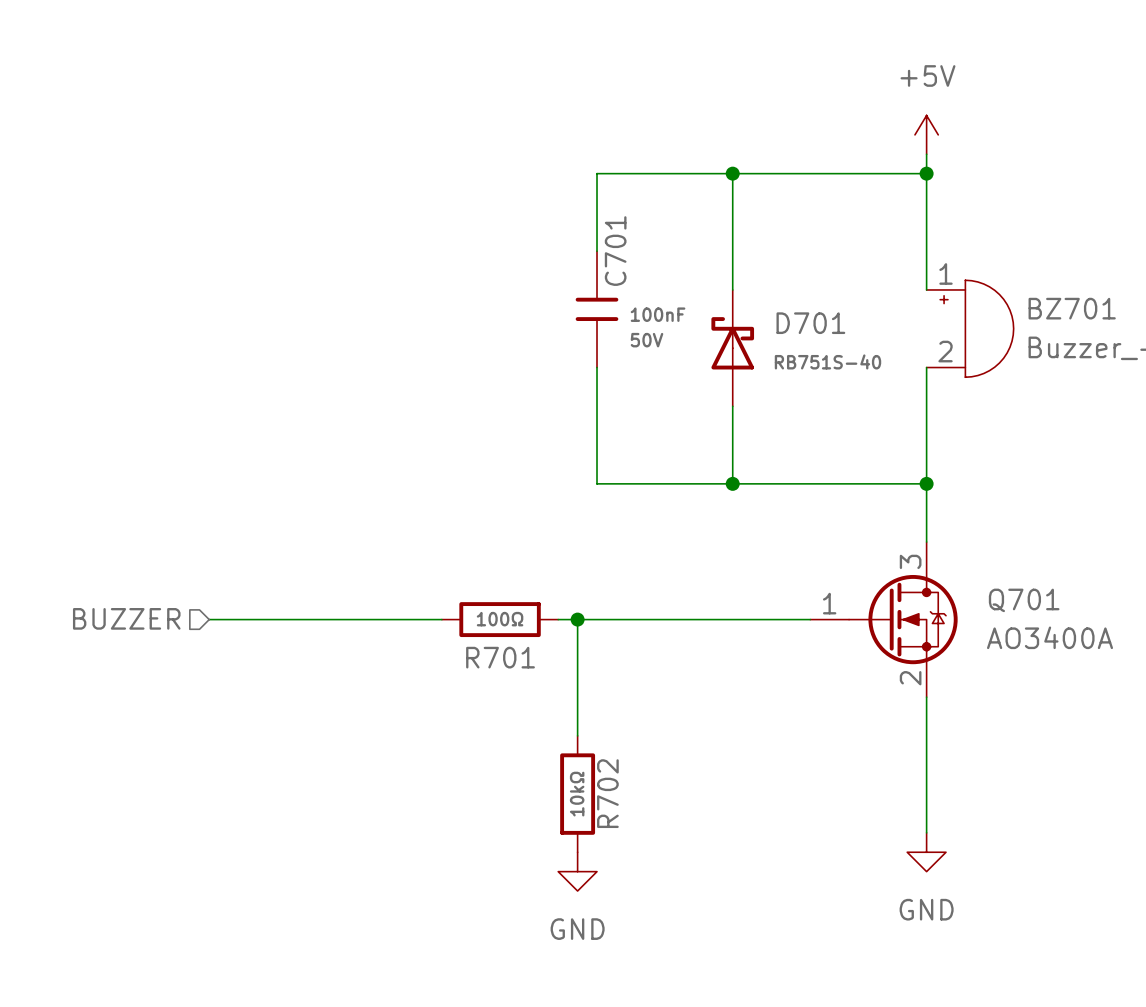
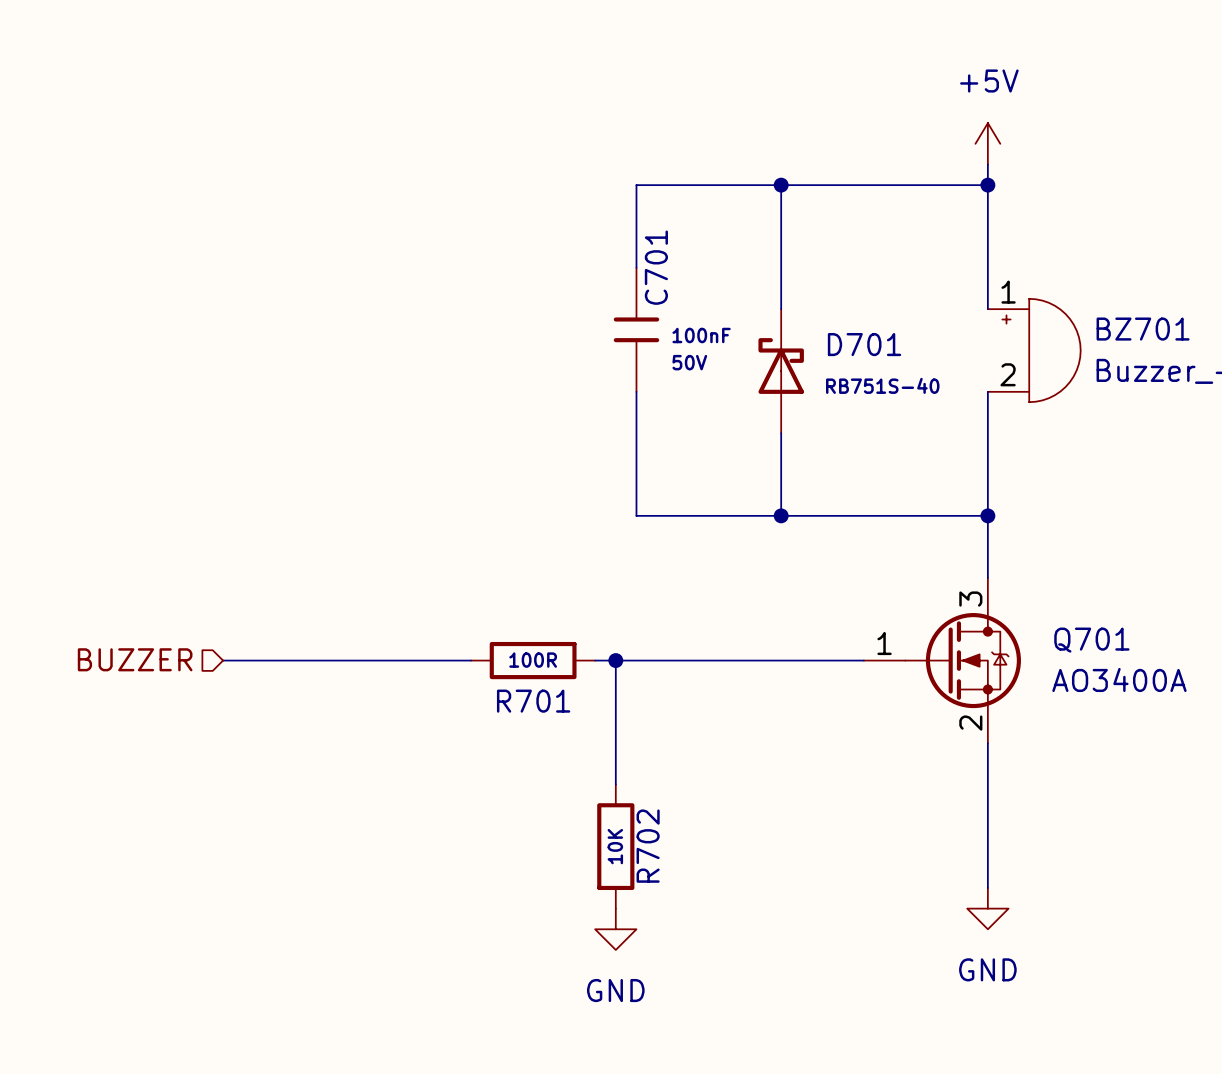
R701 value: 100Ω (500, 619) -> 100R (533, 660)
R702 value: 10kΩ (577, 794) -> 10K (615, 846)

